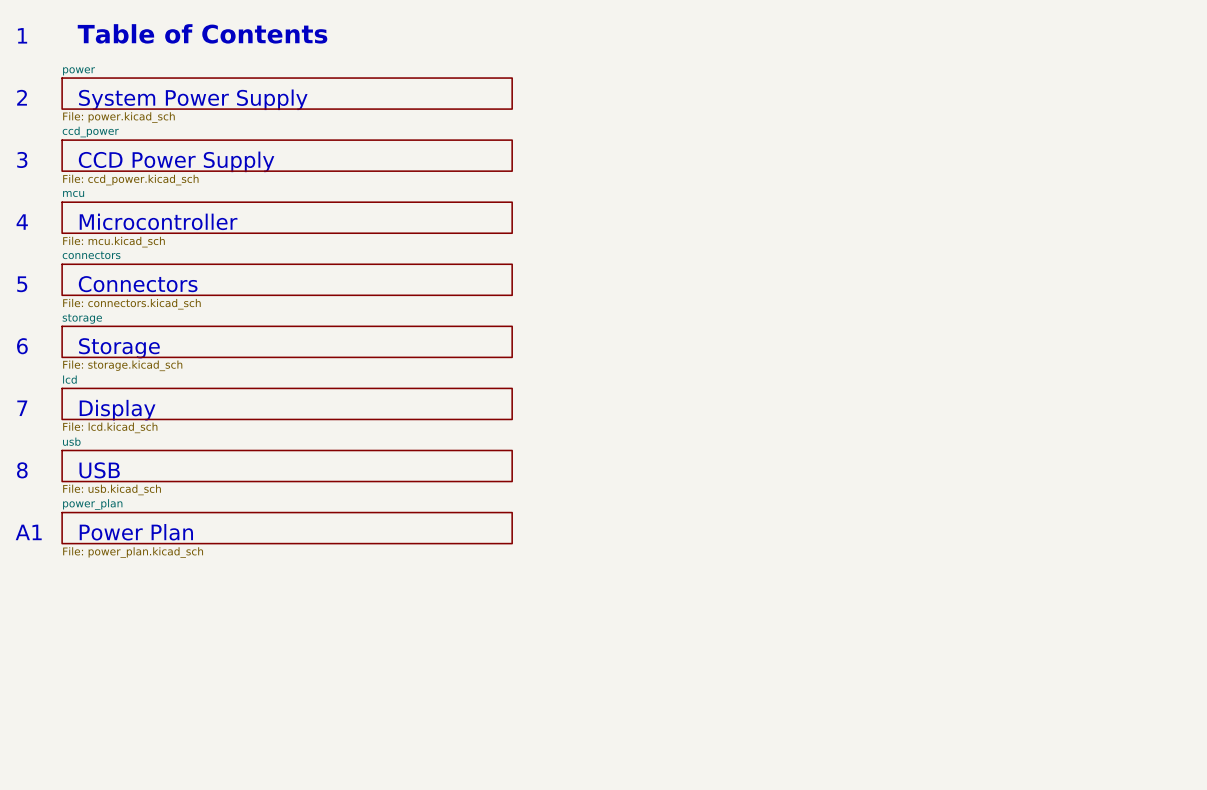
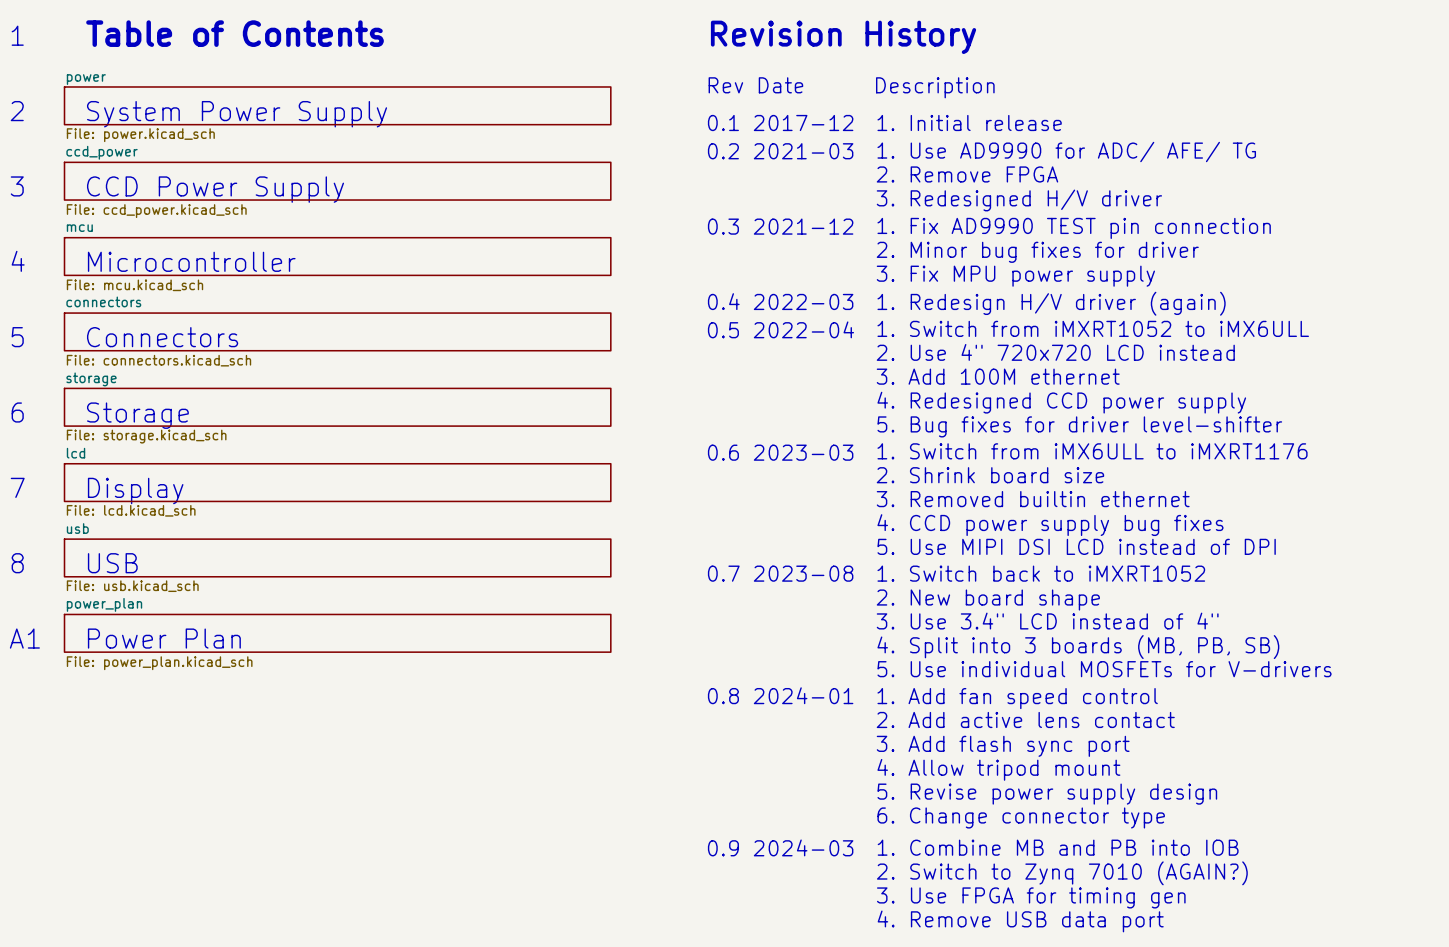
text: none -> Revision History (843, 37)
text: none -> Rev Date Description (851, 87)
text: none -> 0.1 2017-12 (780, 123)
text: none -> 1. Initial release (969, 123)
text: none -> 0.2 2021-03 (780, 151)
text: none -> 1. Use AD9990 for ADC/ AFE/ TG (1066, 152)
text: none -> 2. Remove FPGA (967, 174)
text: none -> 3. Redesigned H/V driver (1019, 200)
text: none -> 0.3 2021-12 (780, 226)
text: none -> 1. Fix AD9990 TEST pin connection (1074, 228)
text: none -> 2. Minor bug fixes for driver (1037, 252)
text: none -> 3. Fix MPU power supply (1015, 276)
text: none -> 0.4 2022-03 (780, 301)
text: none -> 1. Redesign H/V driver (again) (1051, 303)
text: none -> 1. Switch from iMXRT1052 to iMX6ULL (1093, 328)
text: none -> 0.5 2022-04 (780, 329)
text: none -> 2. Use 4" 720x720 LCD instead (1055, 352)
text: none -> 3. Add 100M ethernet (998, 376)
text: none -> 4. Redesigned CCD power supply (1061, 402)
text: none -> 5. Bug fixes for driver level-shifter (1079, 426)
text: none -> 1. Switch from iMX6ULL to iMXRT1176 (1092, 451)
text: none -> 0.6 2023-03 (780, 452)
text: none -> 2. Shrink board size (990, 475)
text: none -> 3. Removed builtin ethernet (1033, 499)
text: none -> 4. CCD power supply bug fixes (1050, 525)
text: none -> 5. Use MIPI DSI LCD instead of DPI (1076, 546)
text: none -> 0.7 2023-08 (780, 573)
text: none -> 1. Switch back to iMXRT1052 (1041, 573)
text: none -> 2. New board shape (988, 599)
text: none -> 3. Use 3.4" LCD instead of 4" (1047, 621)
text: none -> 4. Split into 3 boards (MB, PB, SB) (1078, 647)
text: none -> 5. Use individual MOSFETs for V-drivers (1104, 669)
text: none -> 0.8 2024-01 (780, 695)
text: none -> 1. Add fan speed control (1017, 698)
text: none -> 2. Add active lens contact (1025, 719)
text: none -> 3. Add flash sync port (1003, 746)
text: none -> 4. Allow tripod mount (998, 769)
text: none -> 5. Revise power supply design (1047, 794)
text: none -> 6. Change connector type (1021, 817)
text: none -> 1. Combine MB and PB into IOB (1058, 847)
text: none -> 0.9 2024-03 (780, 847)
text: none -> 2. Switch to Zynq 7010 (AGAIN?) (1062, 873)
text: none -> 3. Use FPGA for timing gen (1031, 897)
text: none -> 4. Remove USB data port (1020, 921)

